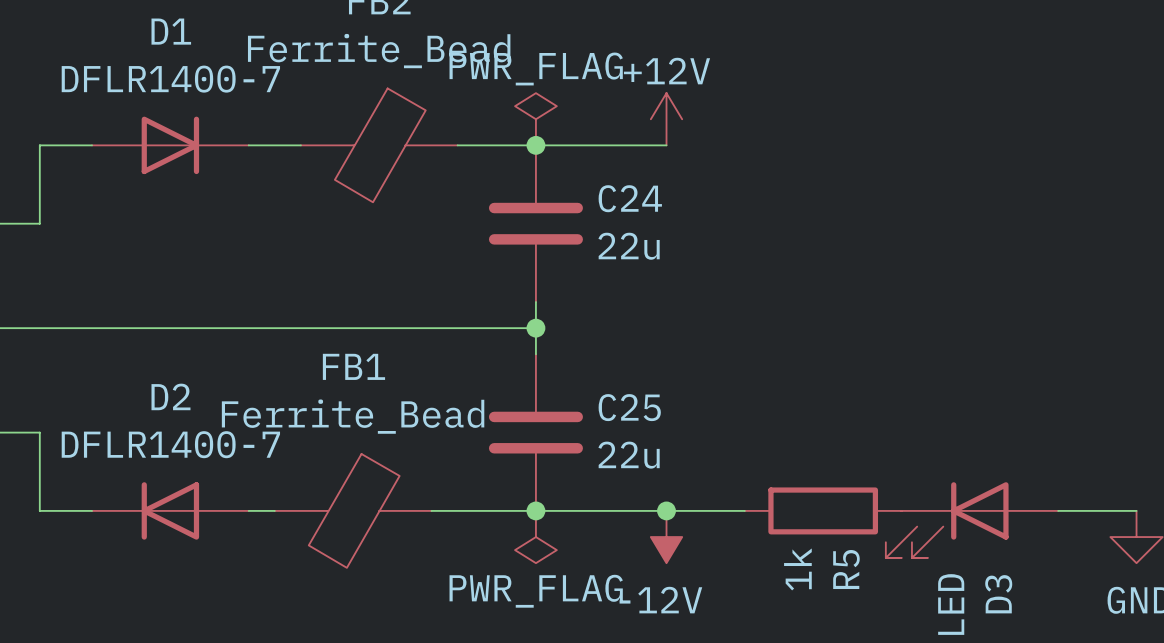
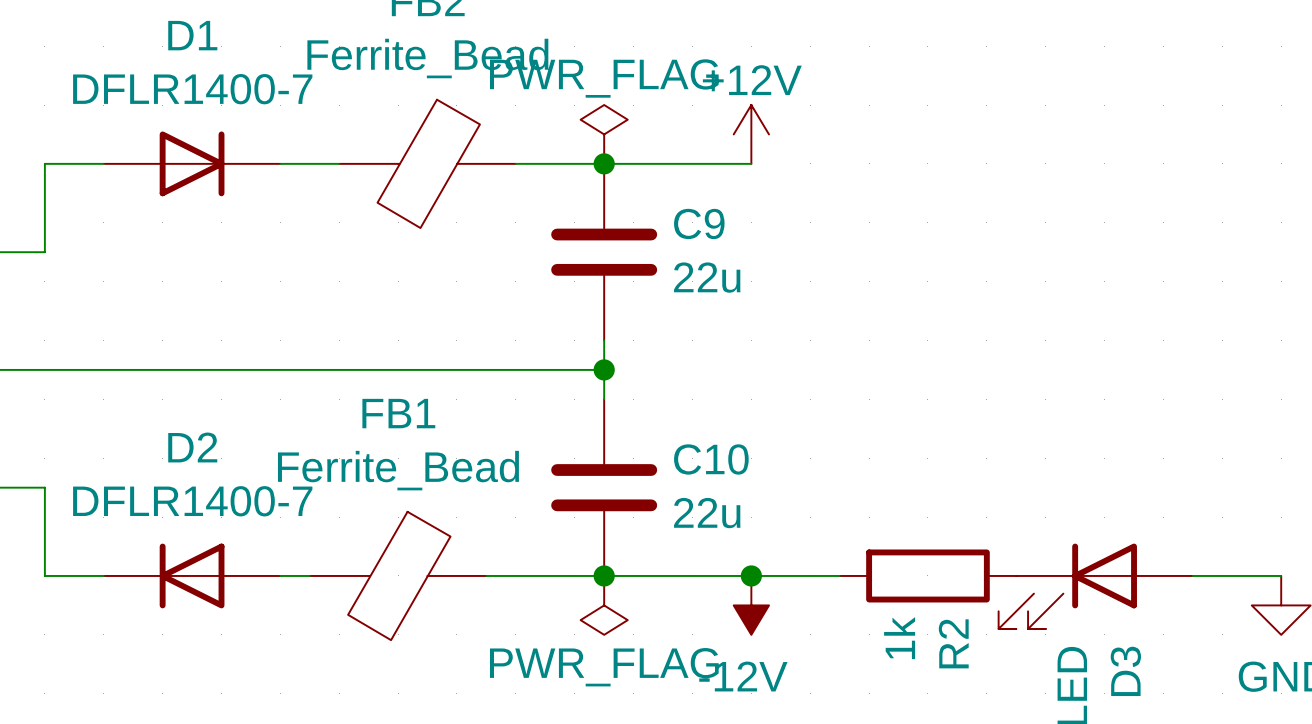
C24 name: C24 (630, 198) -> C9 (699, 223)
C25 name: C25 (629, 407) -> C10 (711, 459)
R5 name: R5 (846, 569) -> R2 (953, 643)

